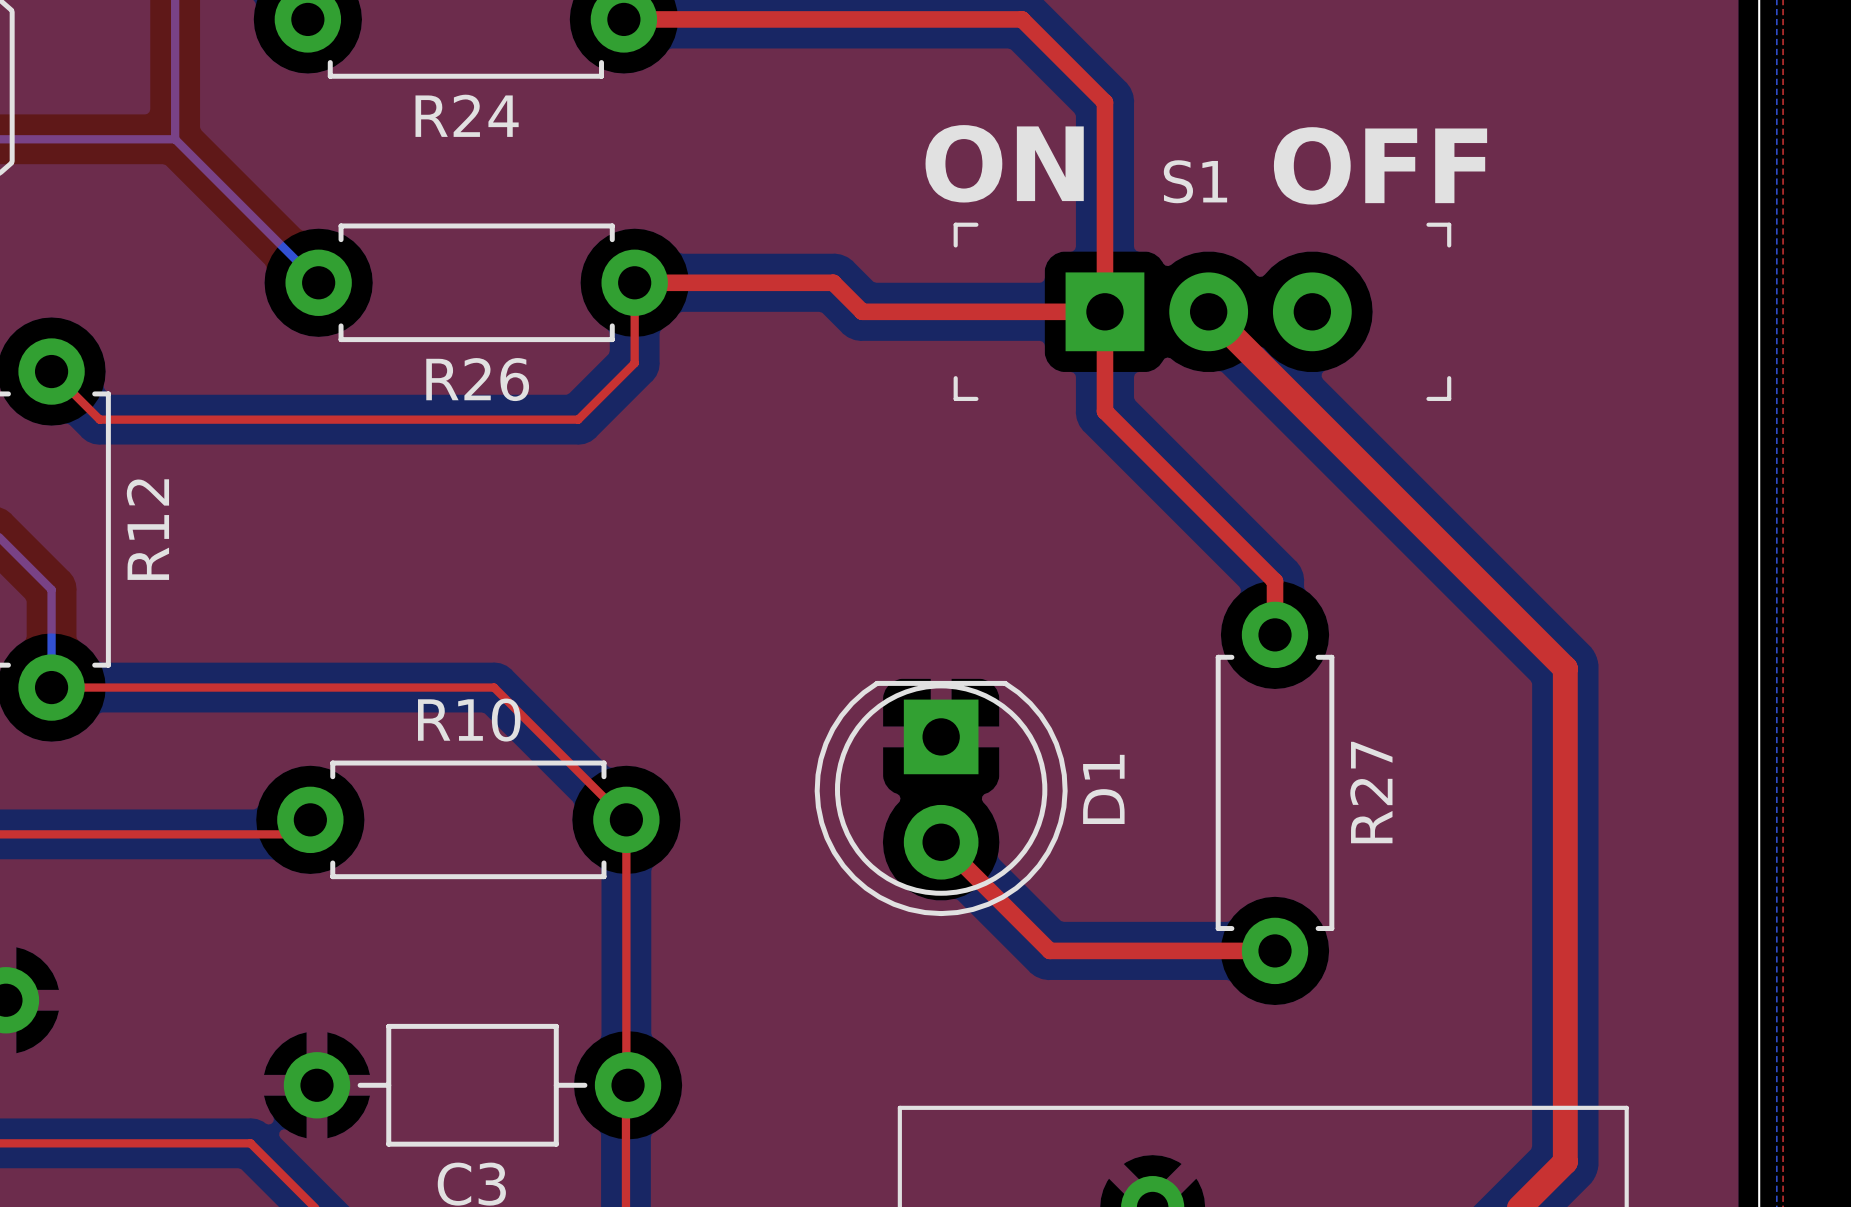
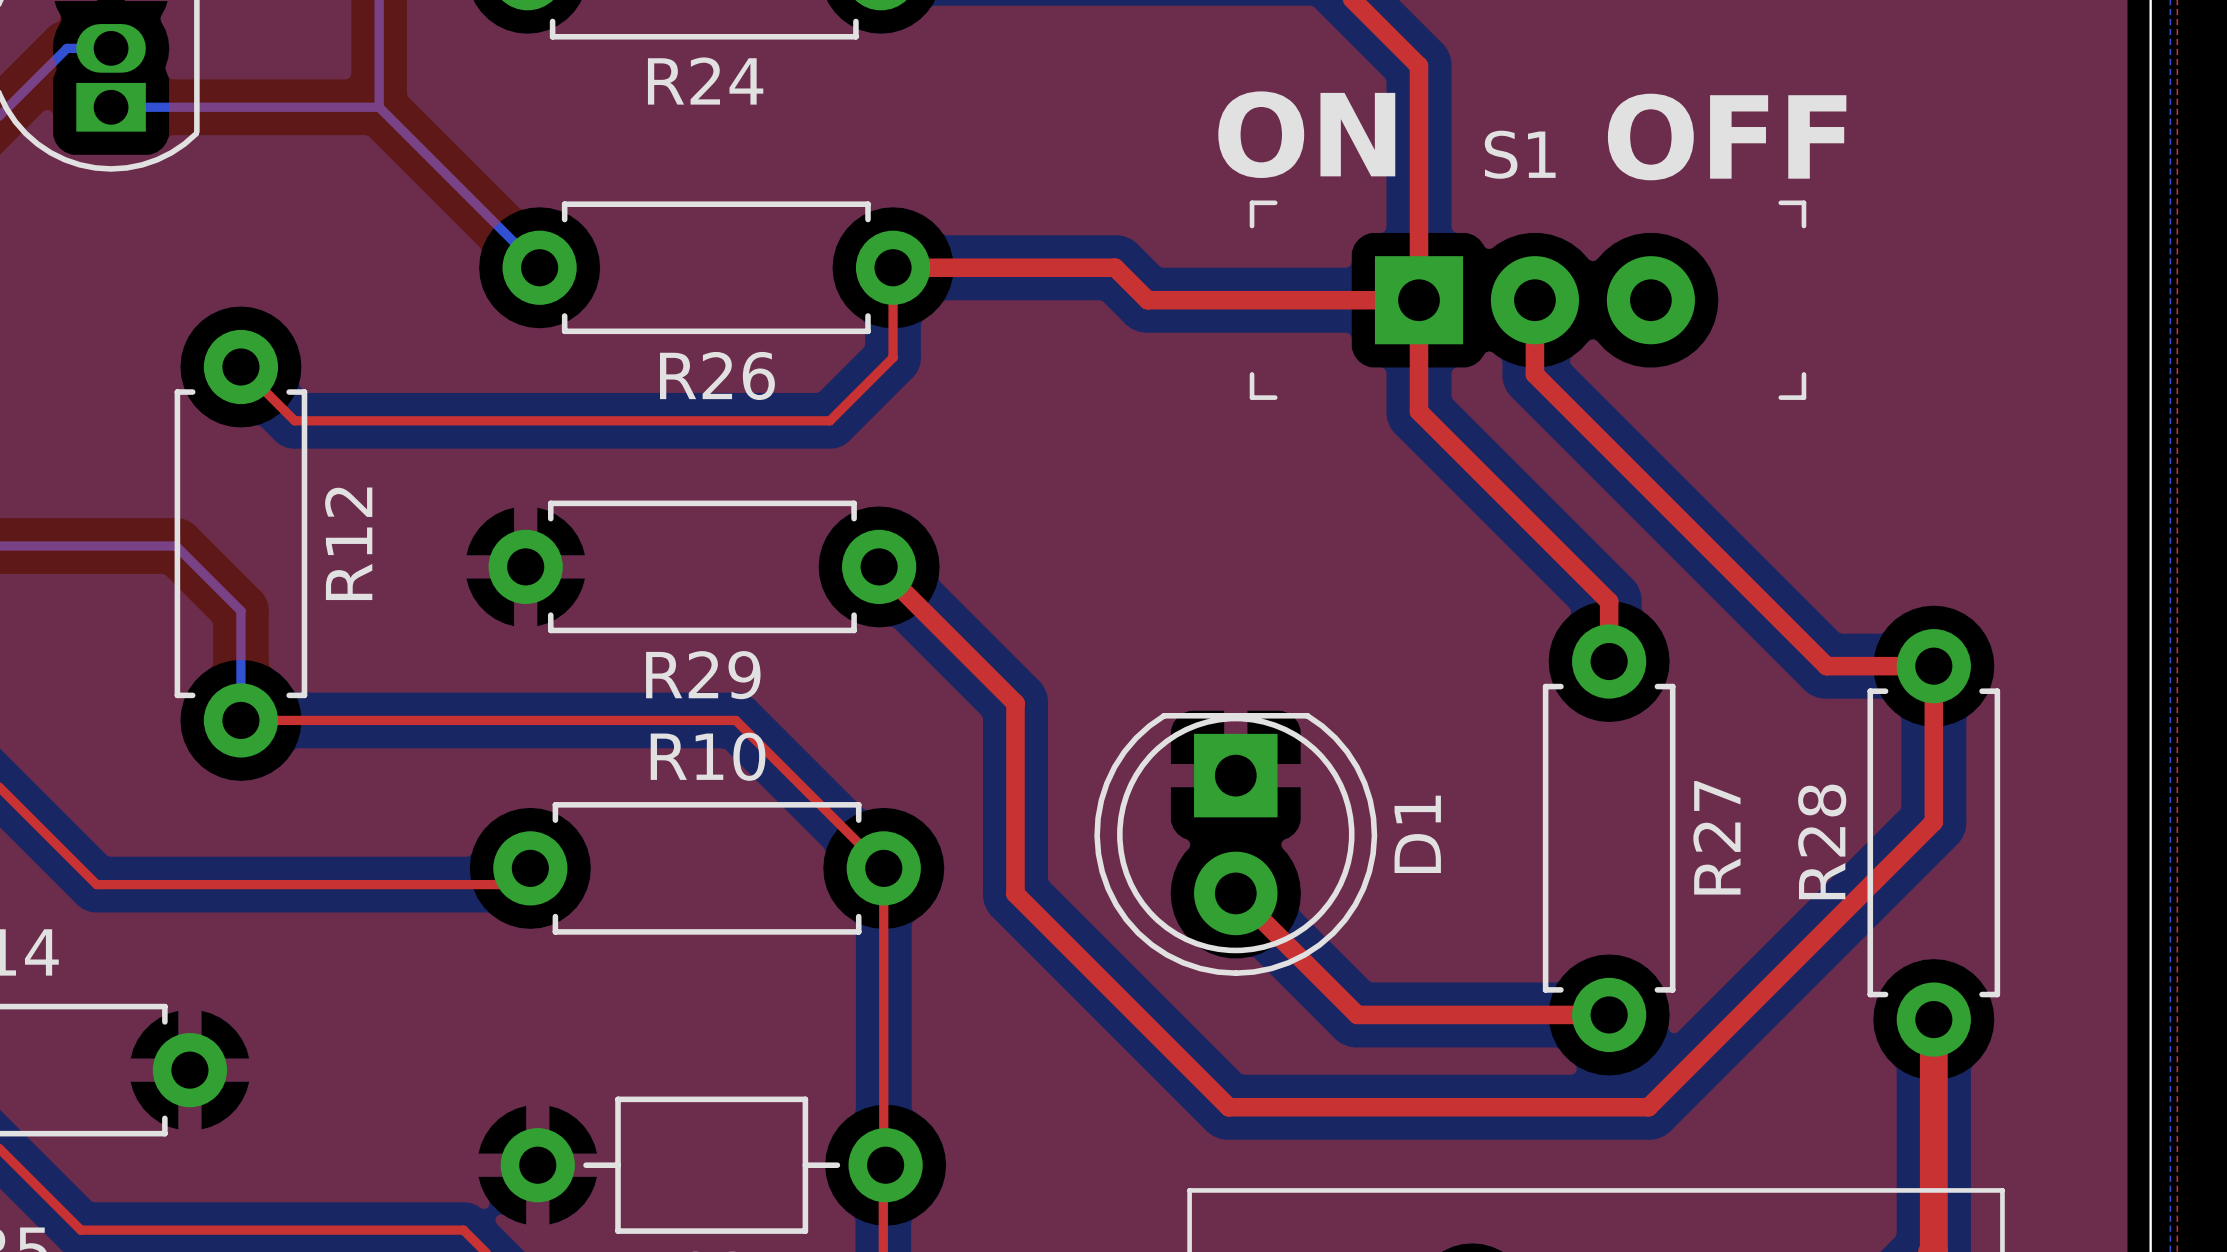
top track: (1208, 311) (1565, 668) -> (1534, 300) (1534, 374) (1826, 666) (1933, 666) (1933, 699)
R29: none -> (702, 566)
top track width: thick (1565, 668) (1565, 778) -> thin (1933, 699) (1933, 821)
top track: (1565, 778) (1565, 955) -> (1933, 821) (1648, 1107) (1228, 1107) (1015, 893) (1015, 703) (879, 566)
R28: none -> (1933, 842)

